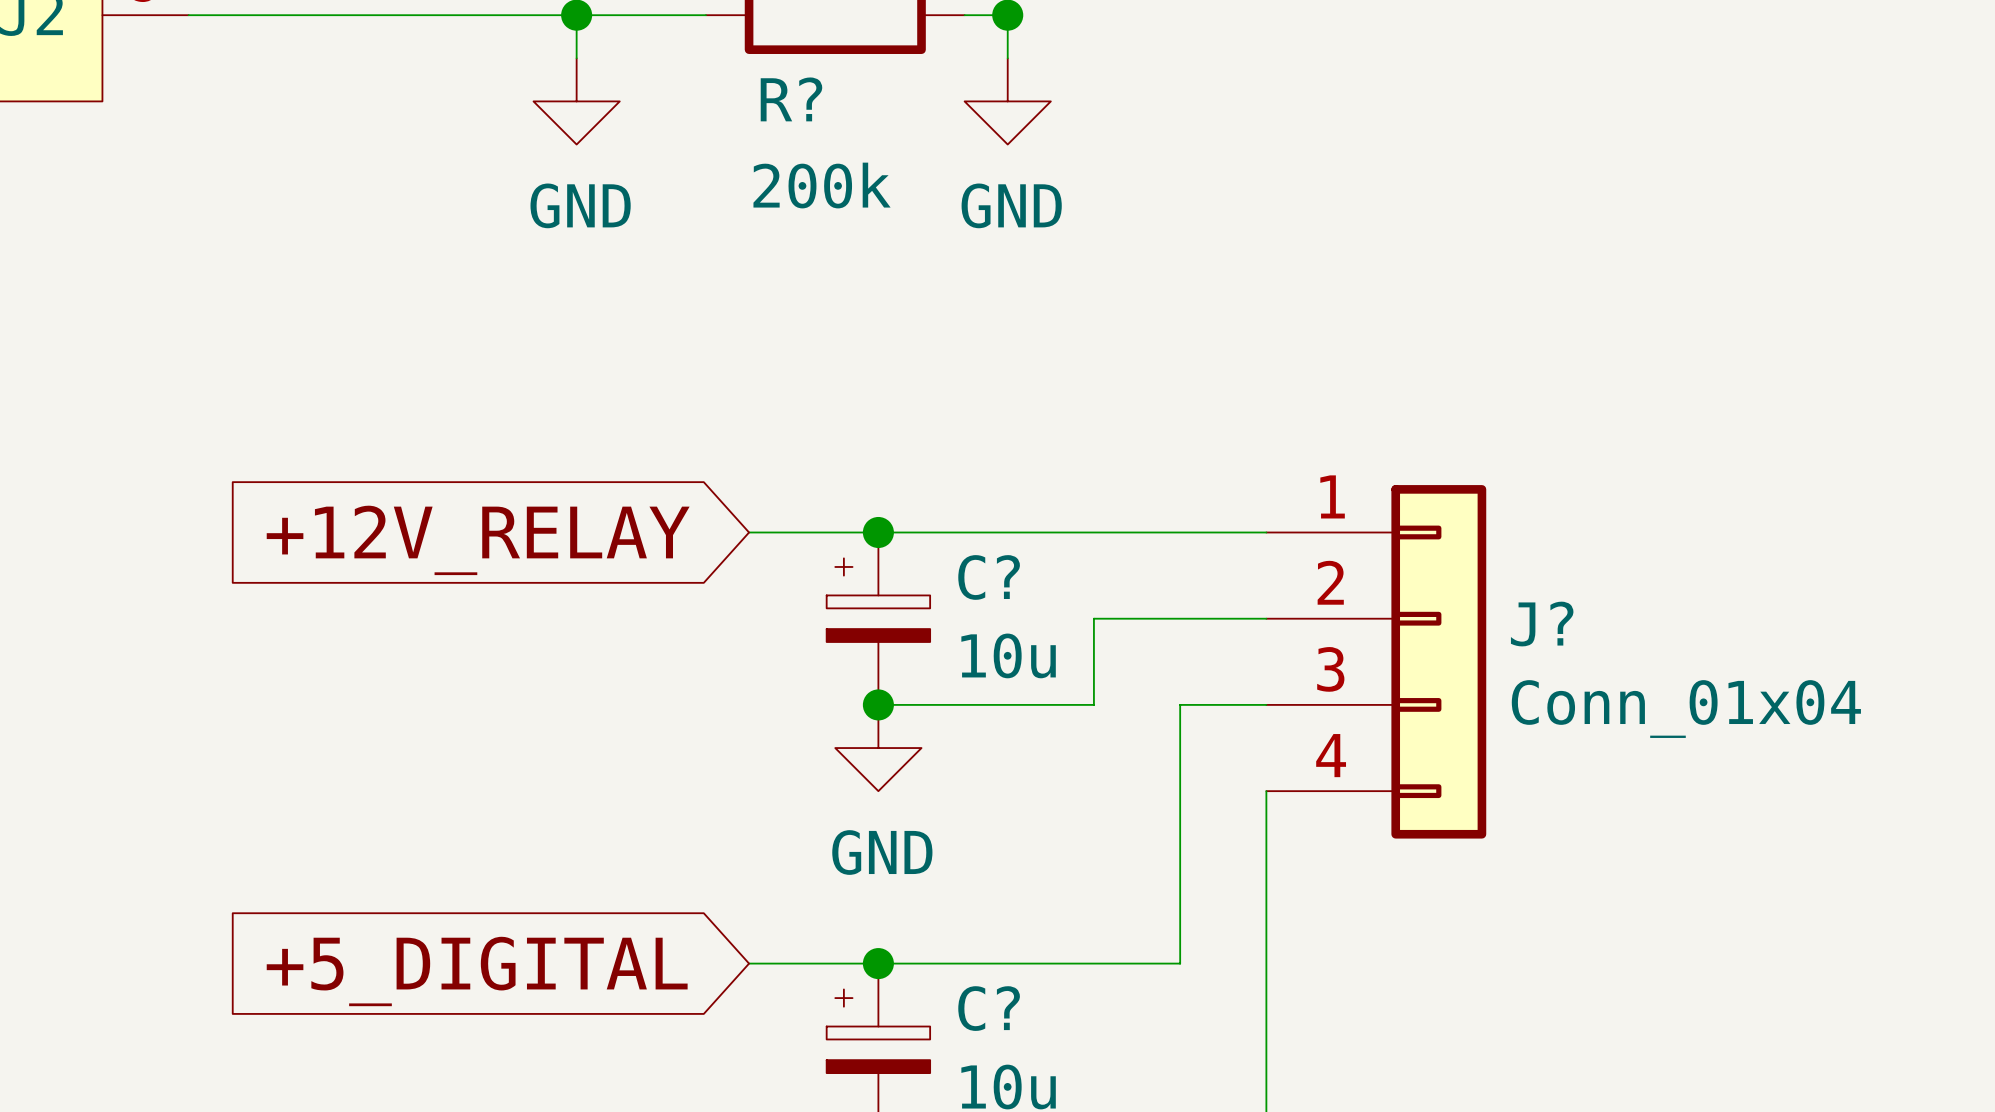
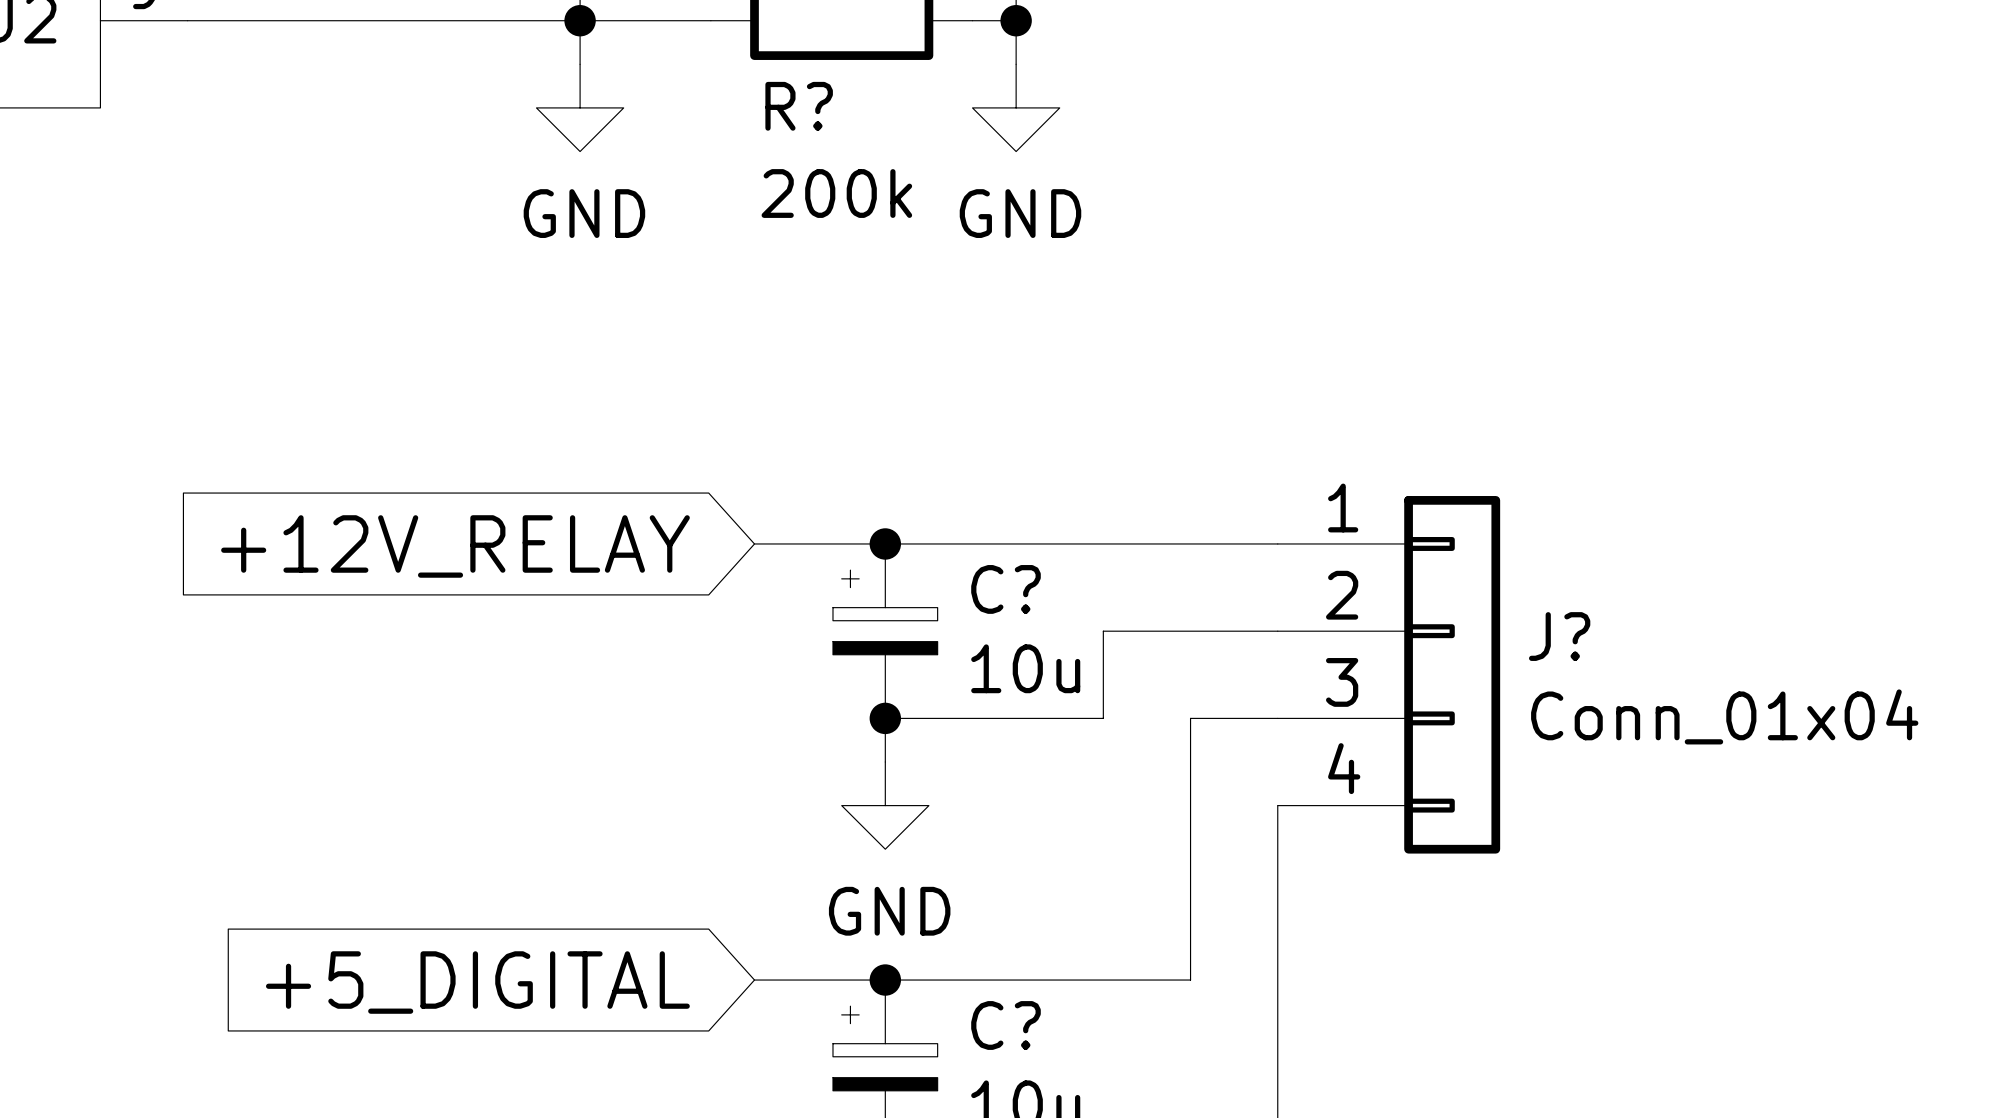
power symbol position: GND (878, 748) -> GND (885, 805)

